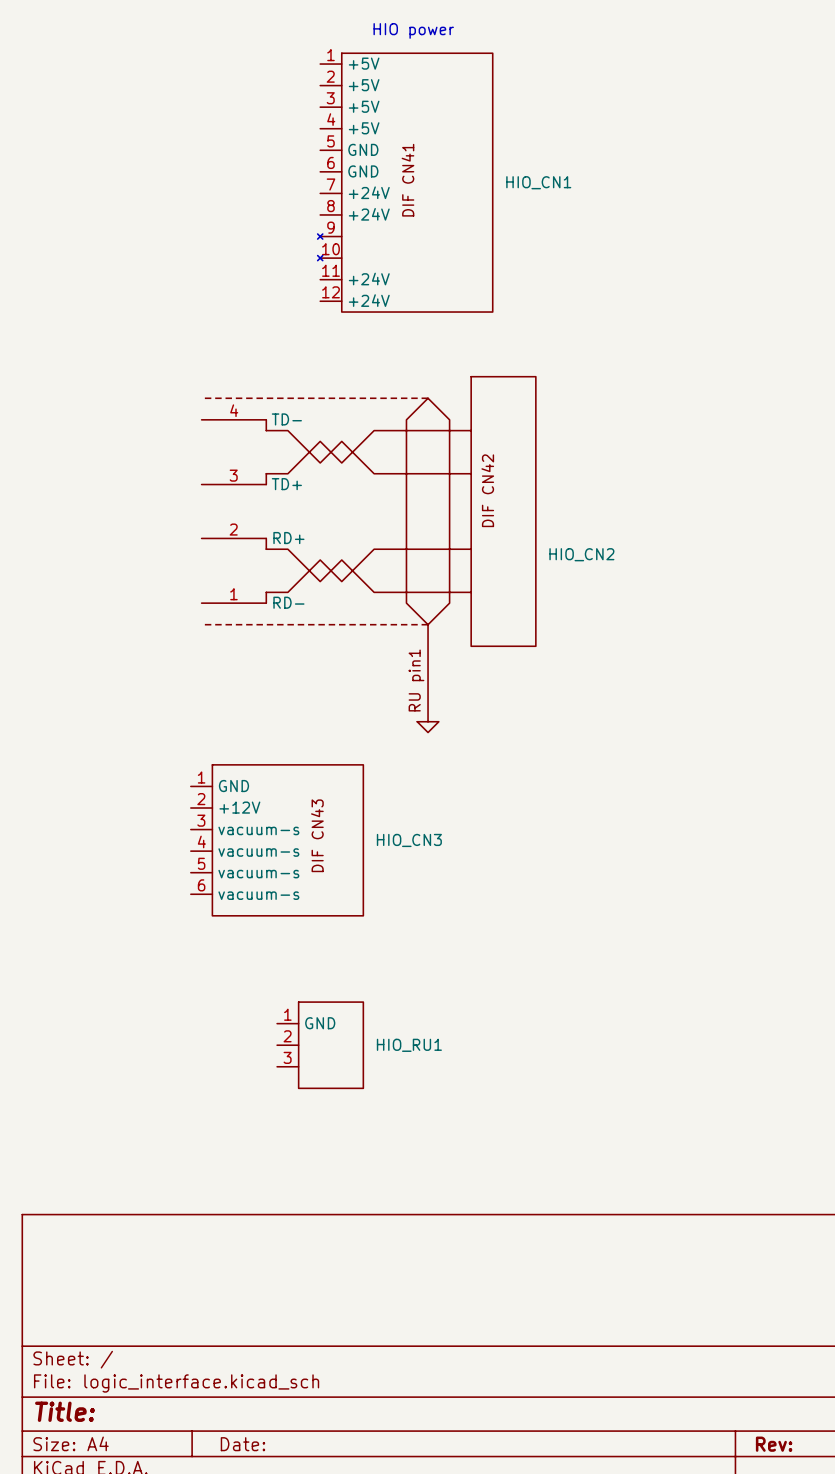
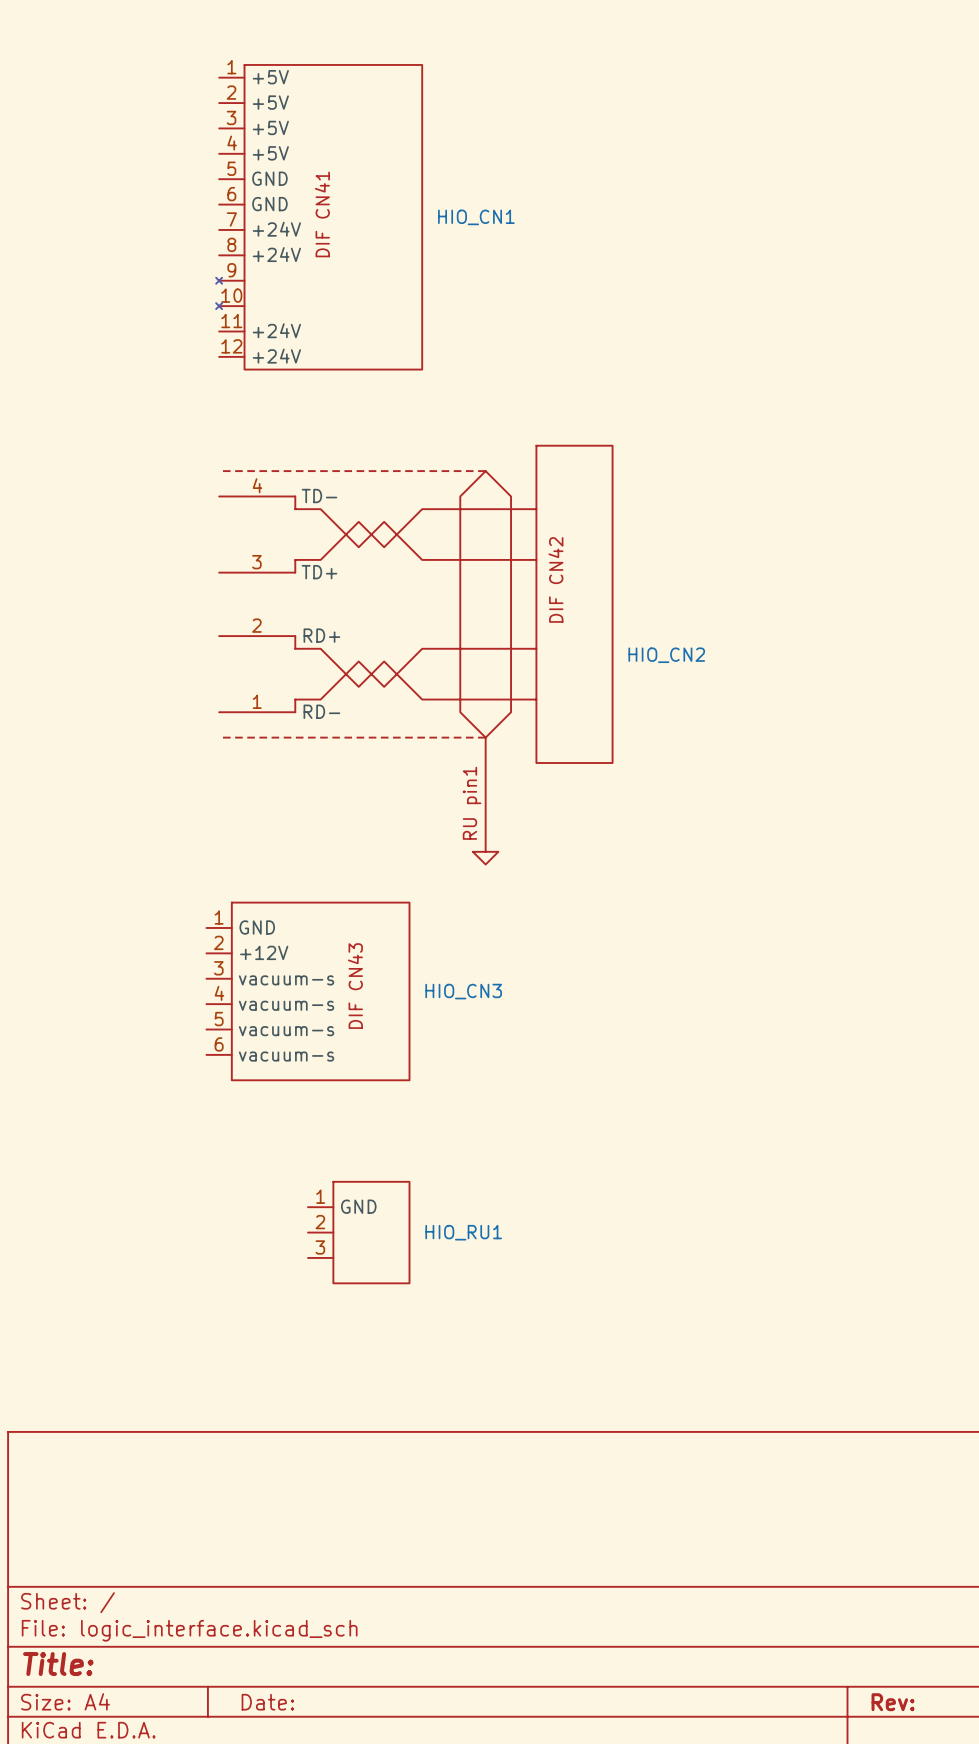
text: HIO power (413, 30) -> none
HIO_CN1 position: (405, 182) -> (319, 217)

